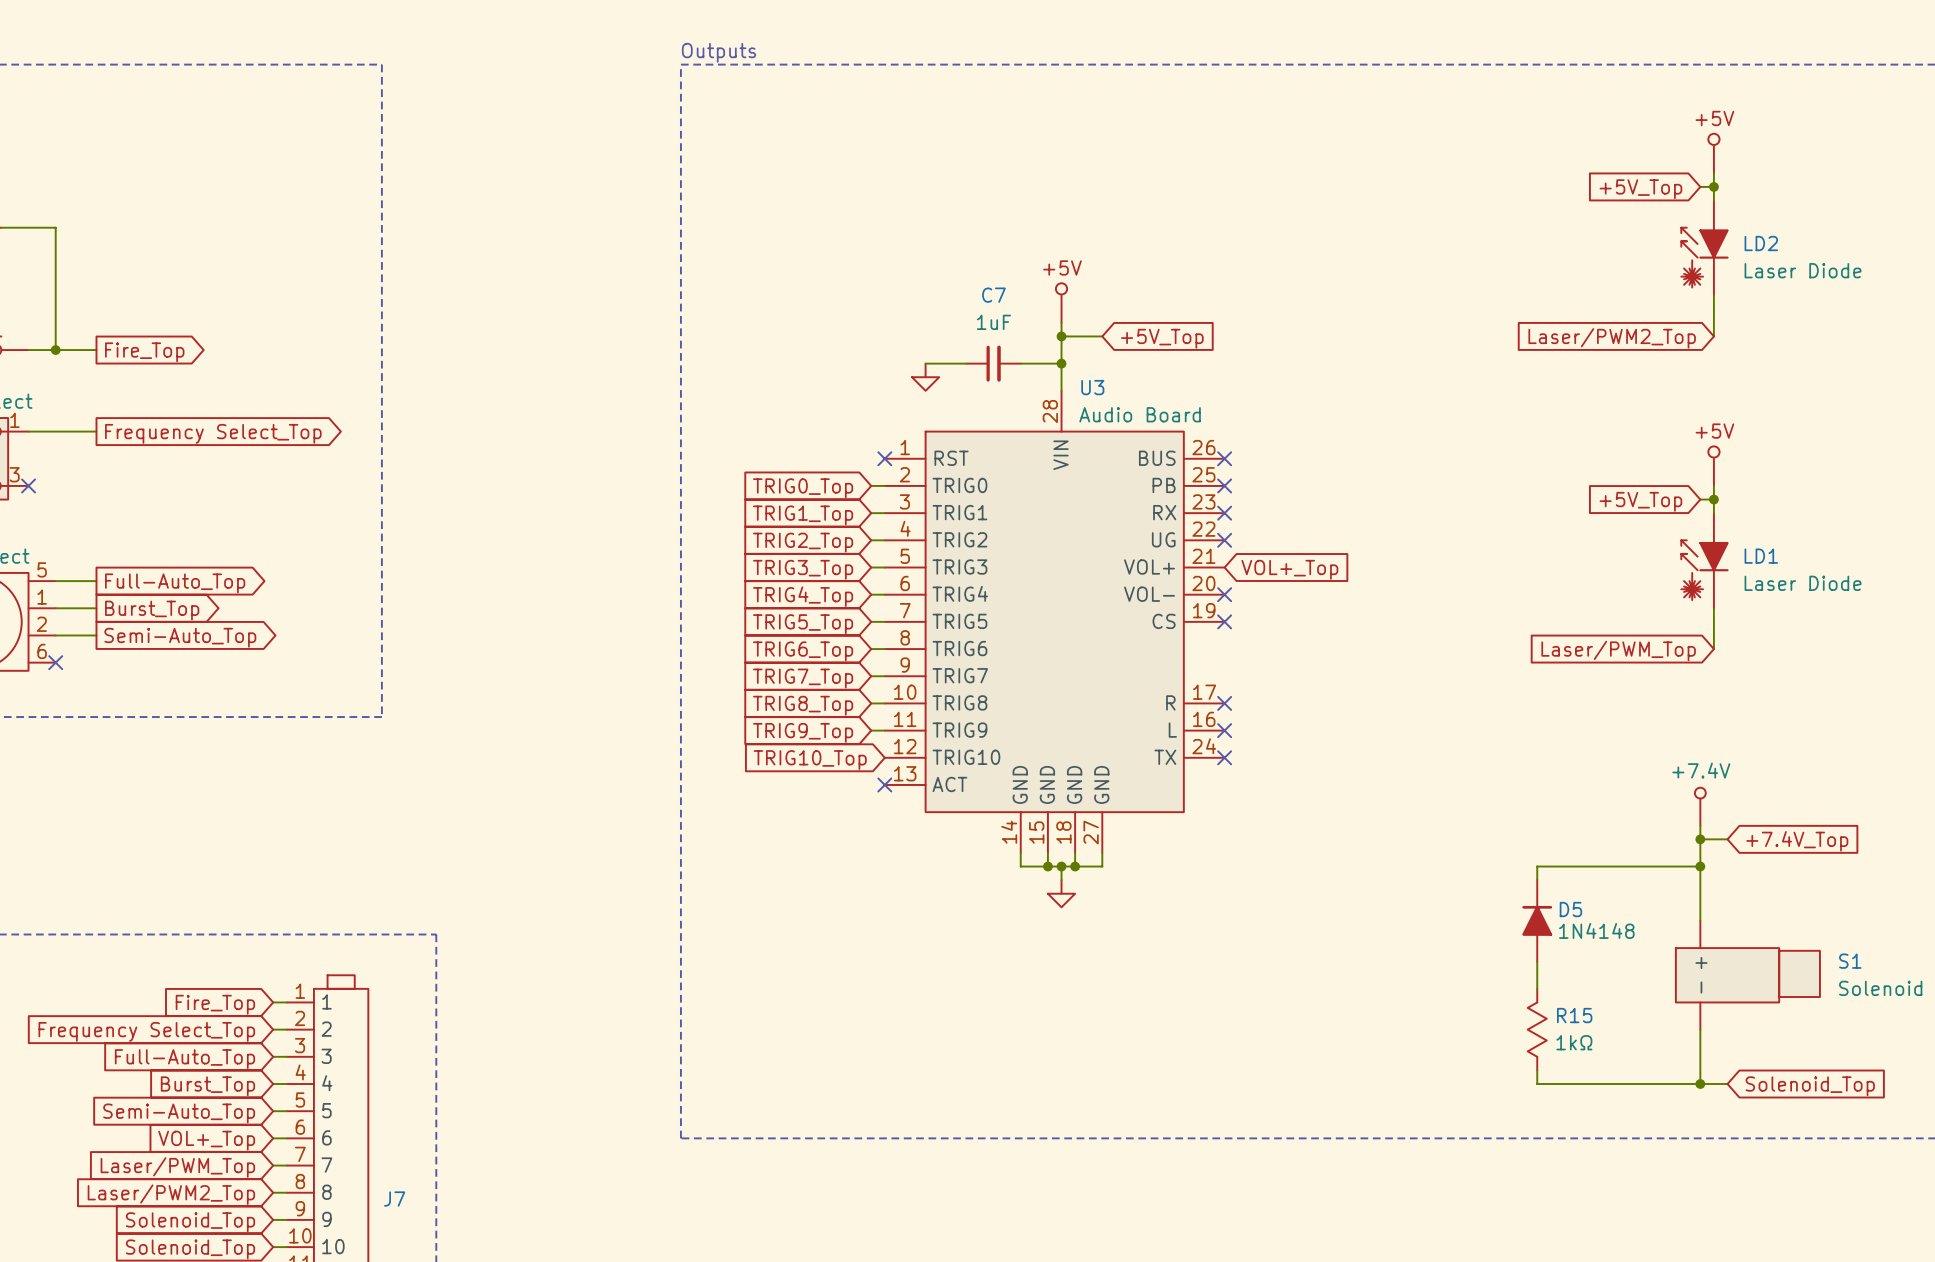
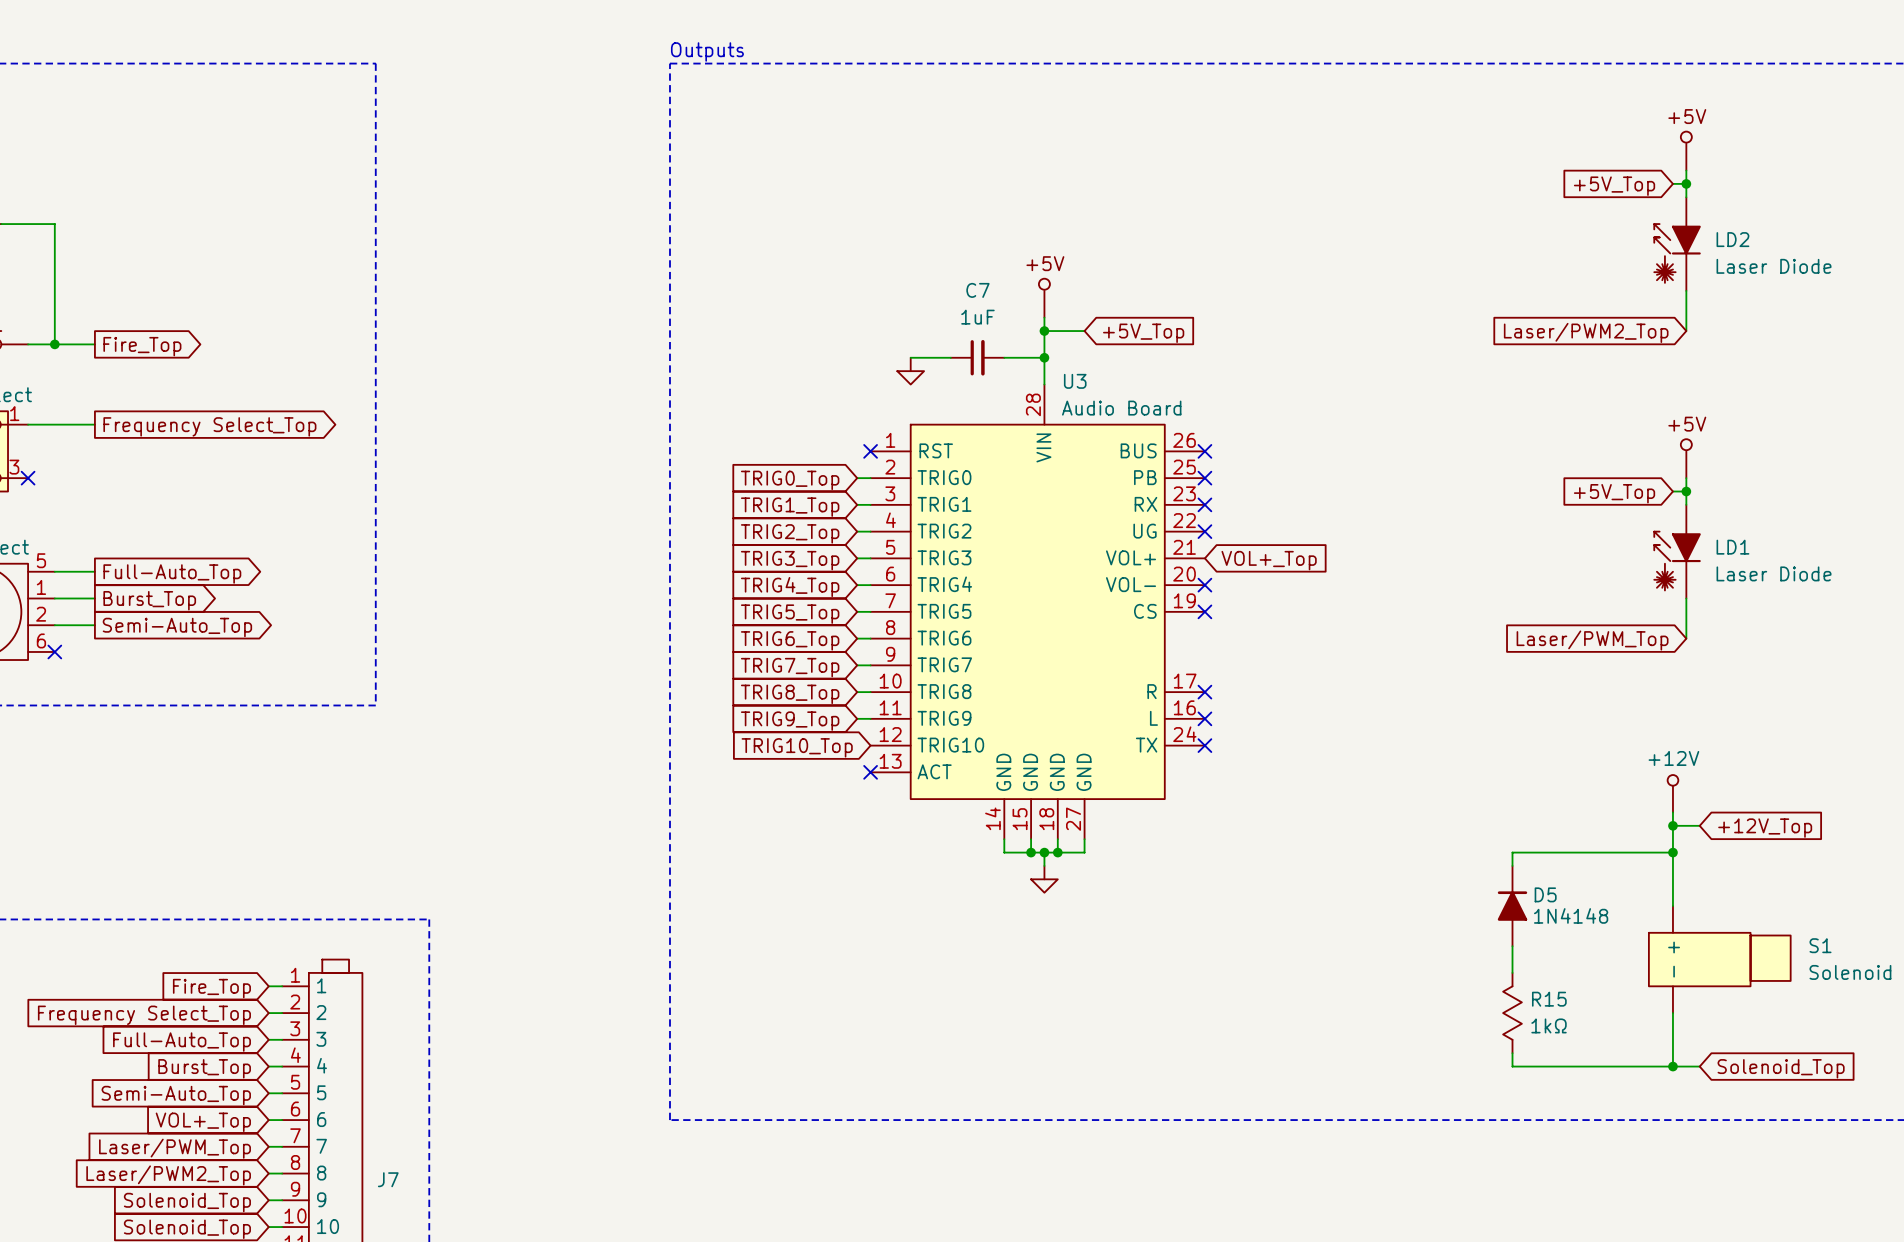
power symbol: +7.4V (1700, 806) -> +12V (1672, 793)
global label: +7.4V_Top (1797, 841) -> +12V_Top (1765, 828)

